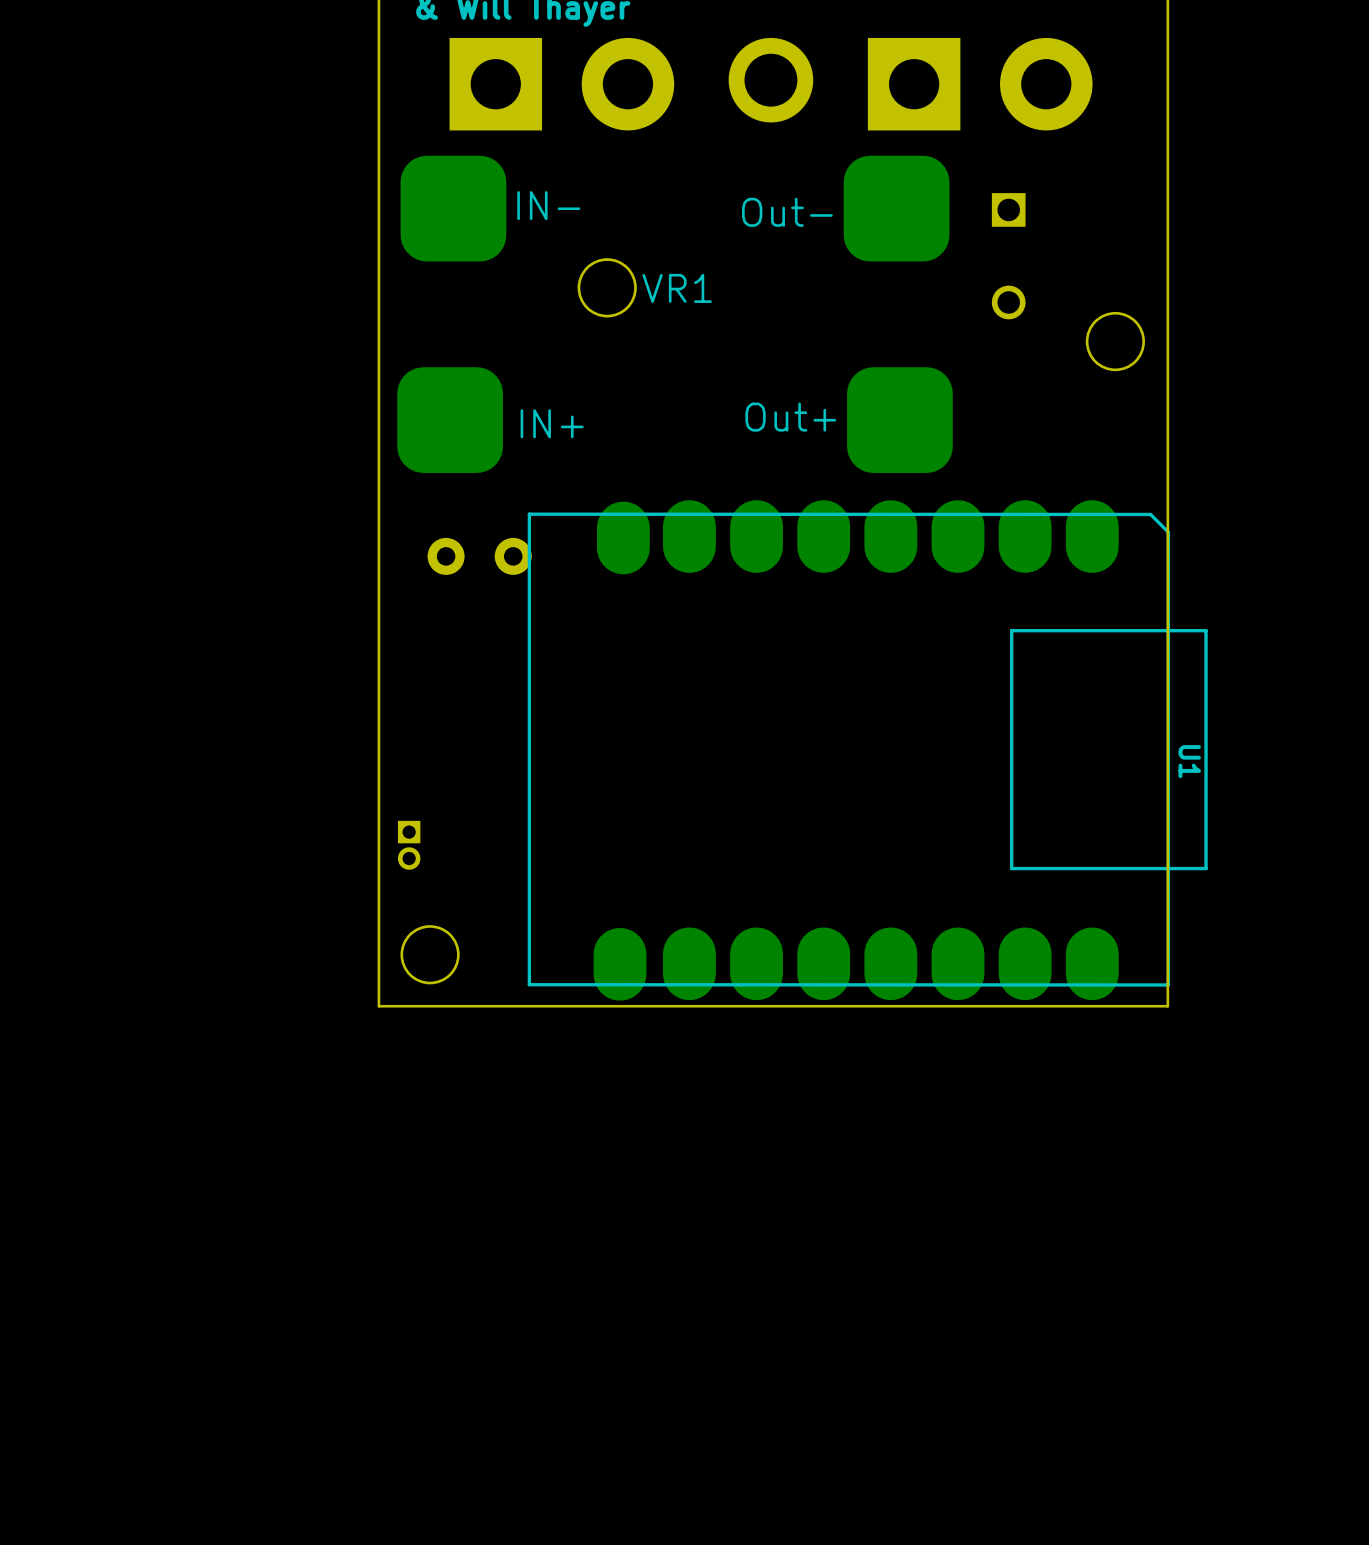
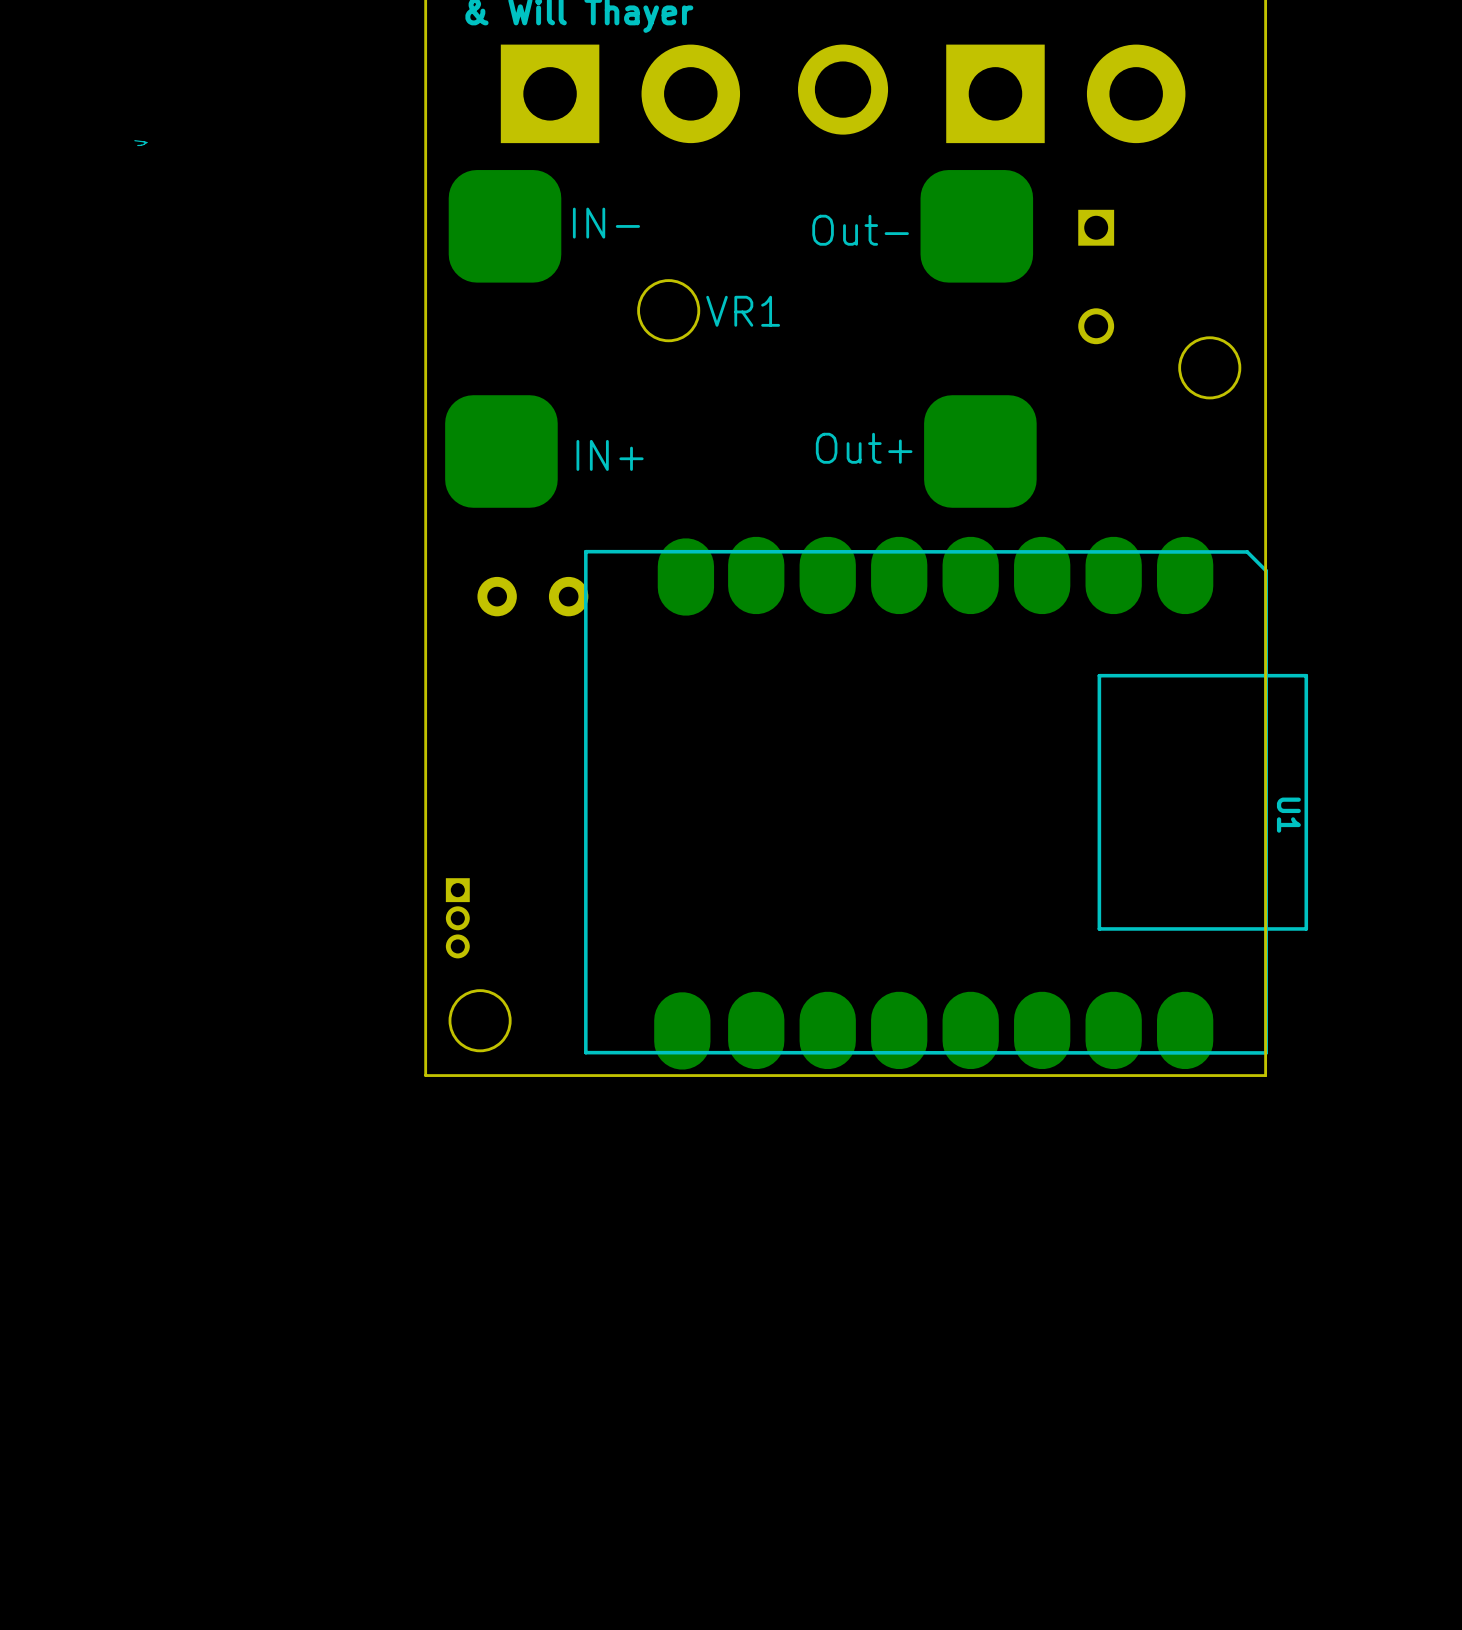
line: none -> (134, 140) (146, 142) (137, 145)
part footprint: [397, 820, 421, 870] -> [445, 878, 470, 959]

